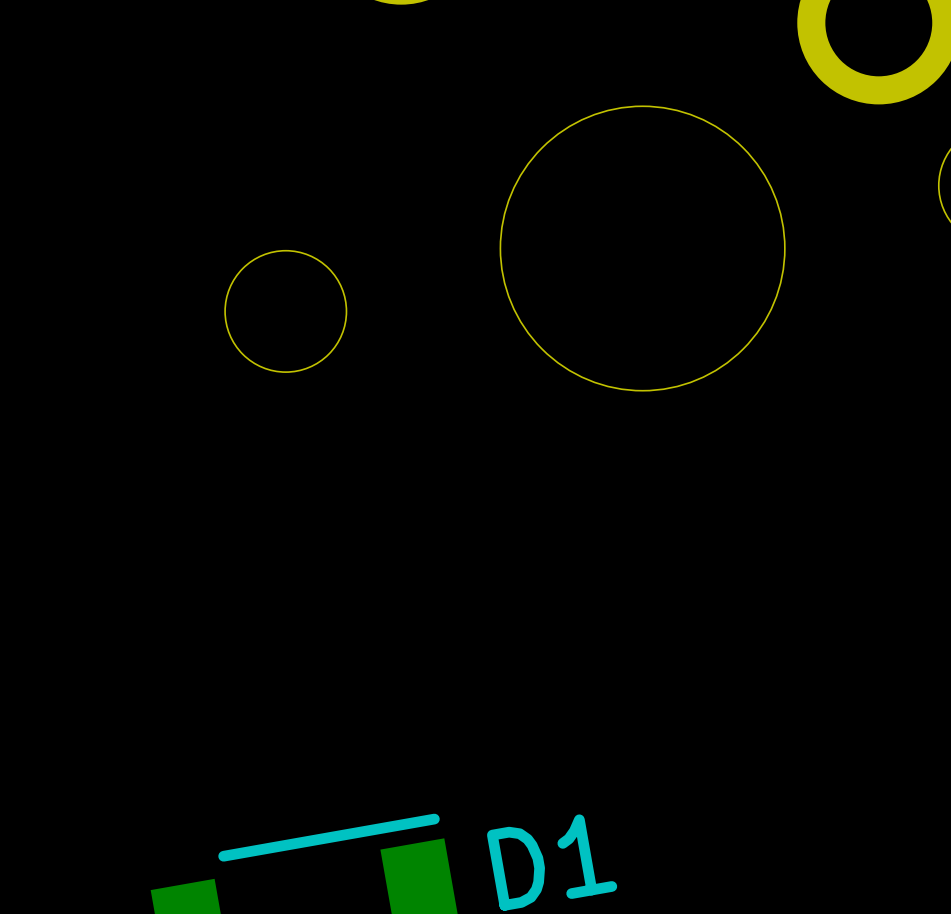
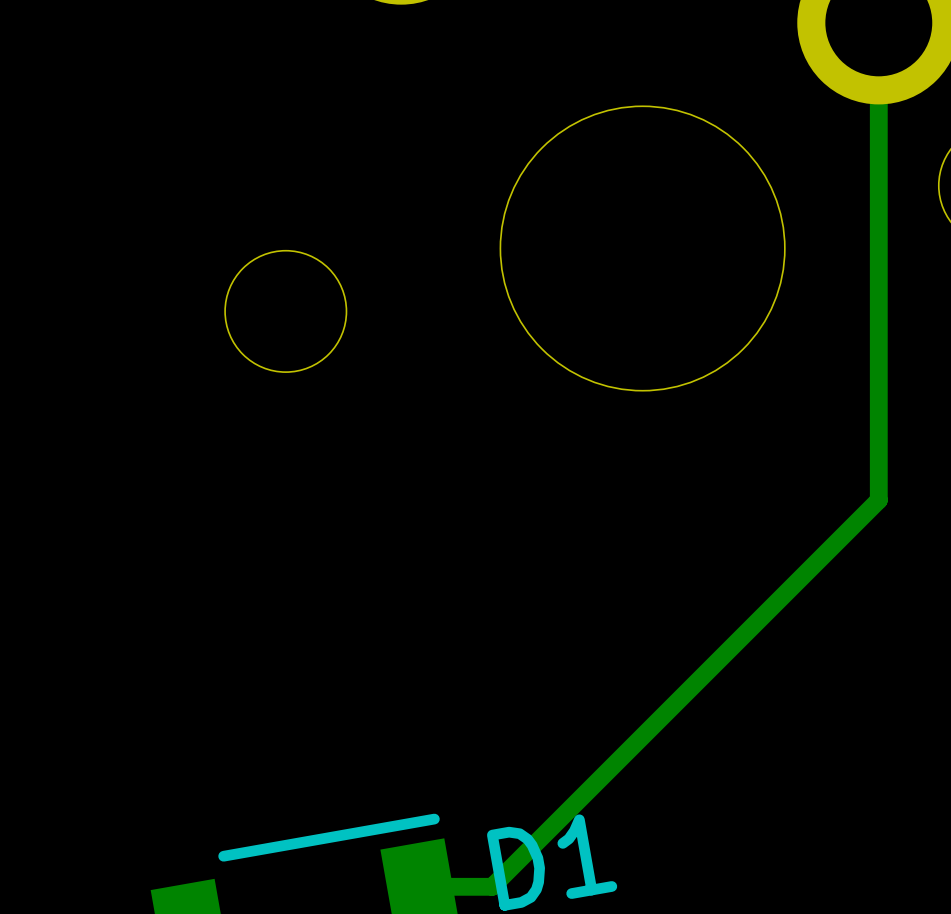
bottom track: none -> (878, 22) (878, 500) (492, 886) (419, 886)

